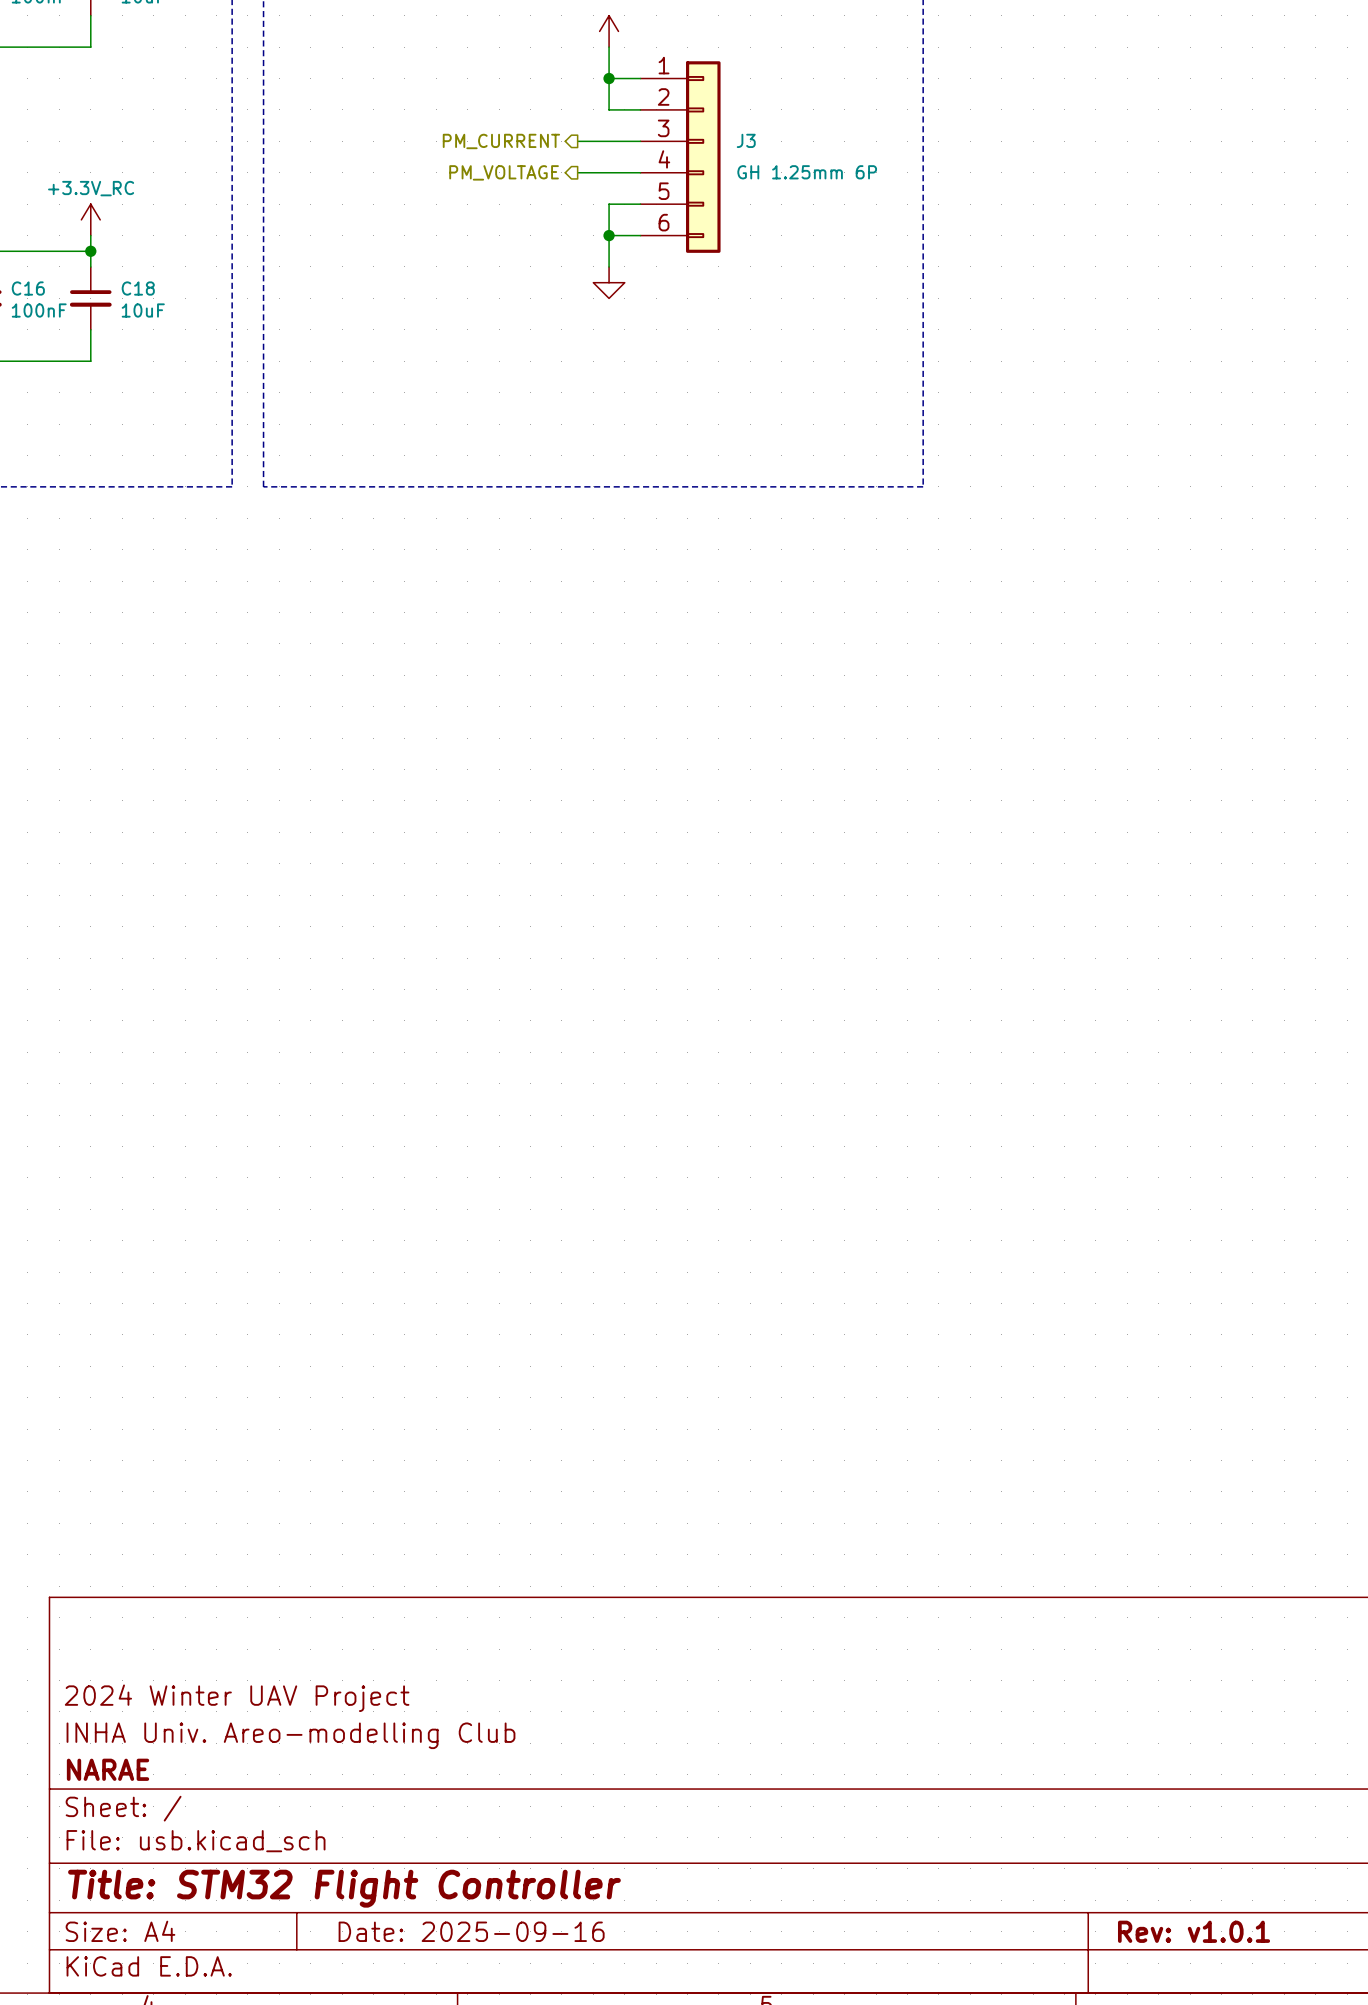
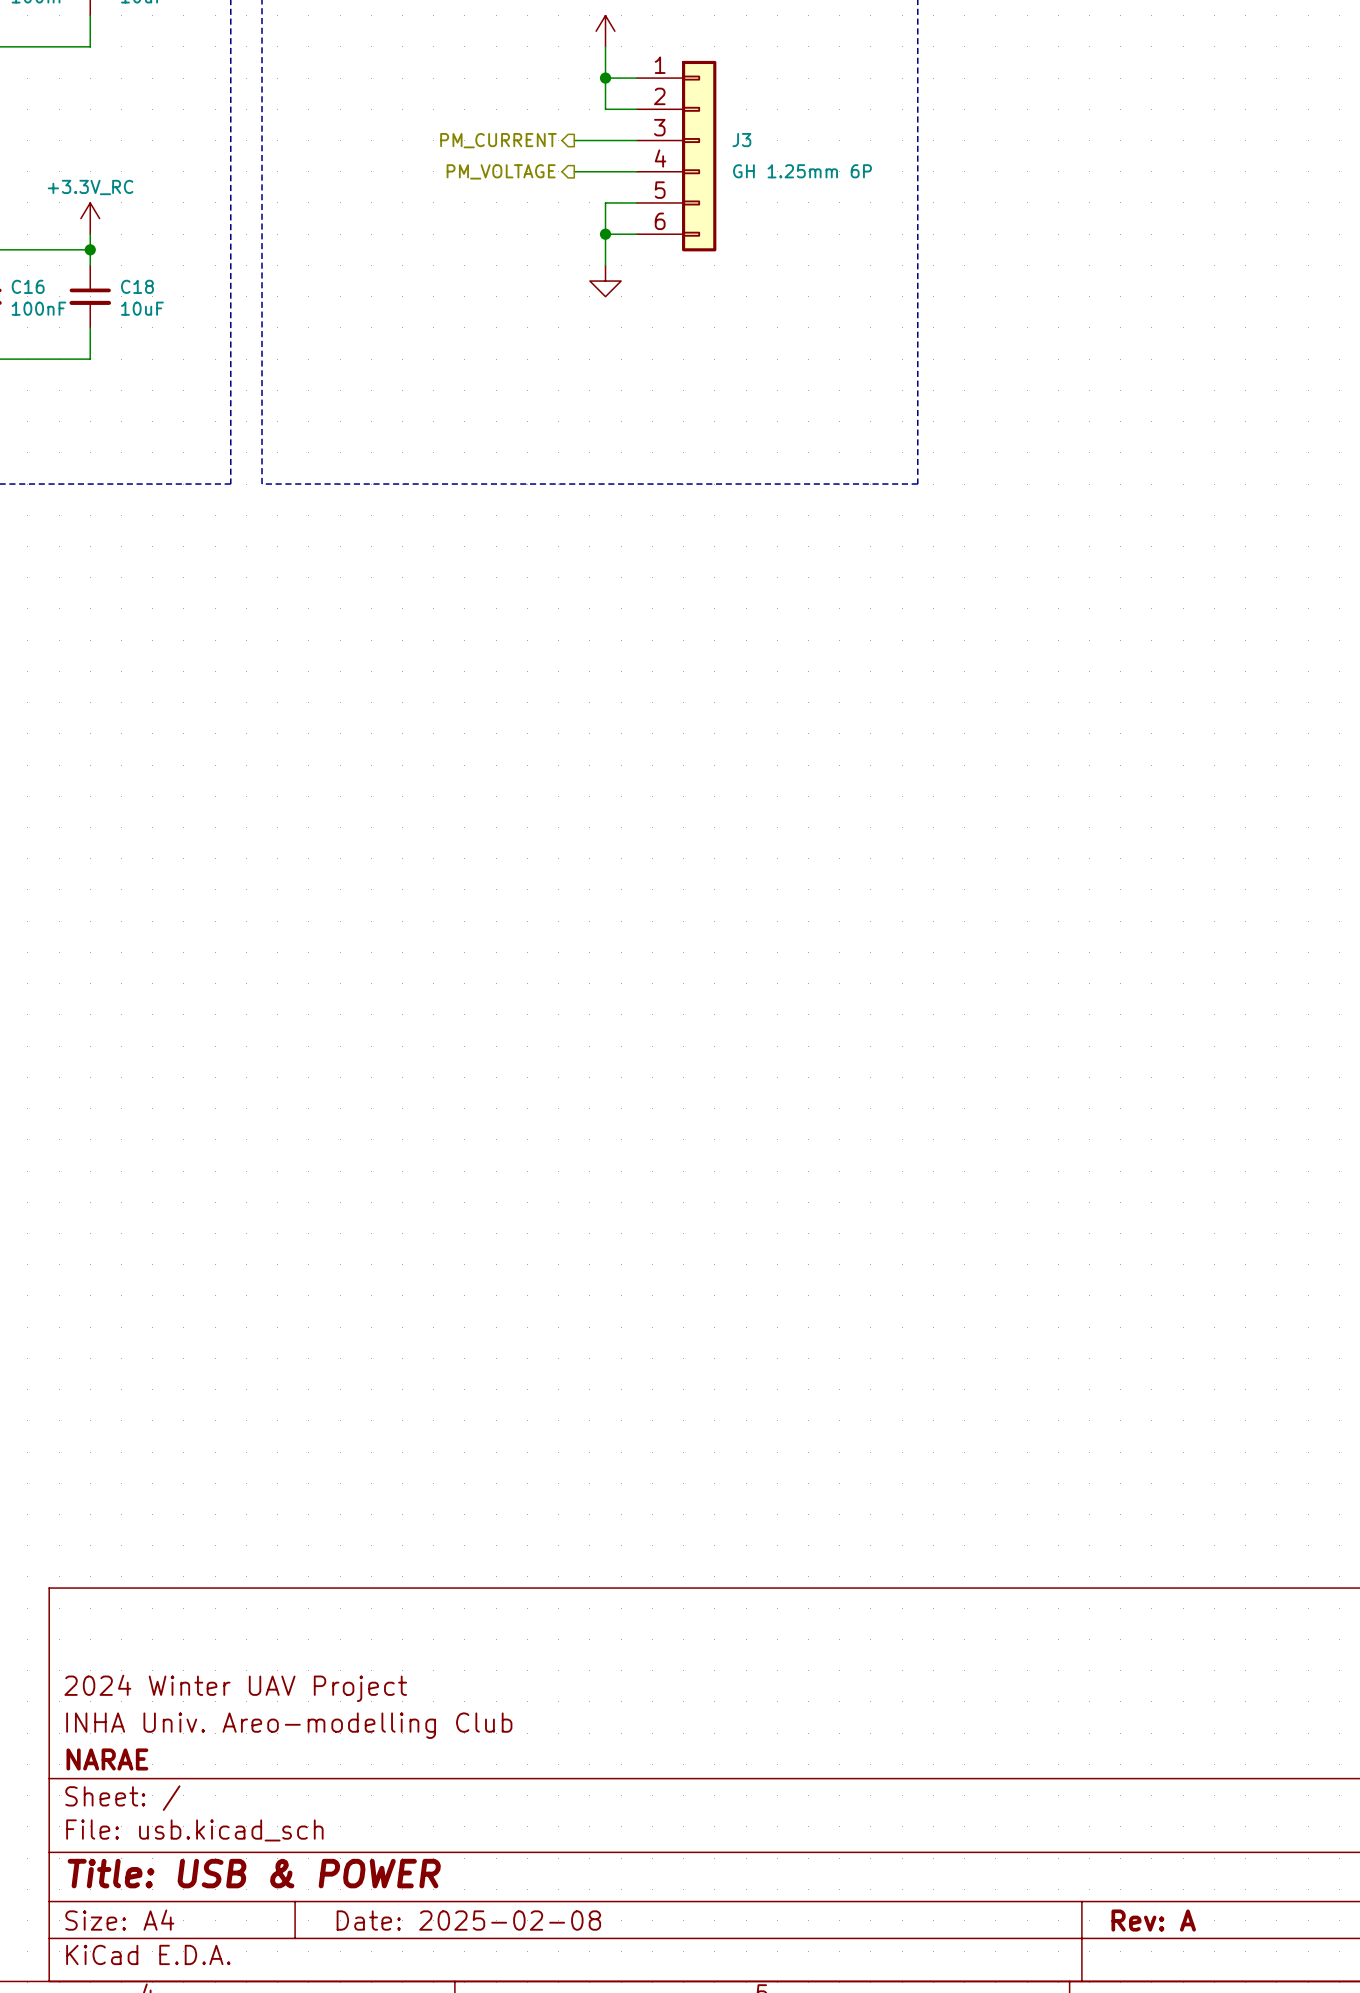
title block: Title: STM32 Flight Controller (344, 1888) -> Title: USB & POWER (254, 1873)
title block: Date: 2025-09-16 (471, 1931) -> Date: 2025-02-08 (468, 1920)
title block: Rev: v1.0.1 (1194, 1931) -> Rev: A (1153, 1920)

